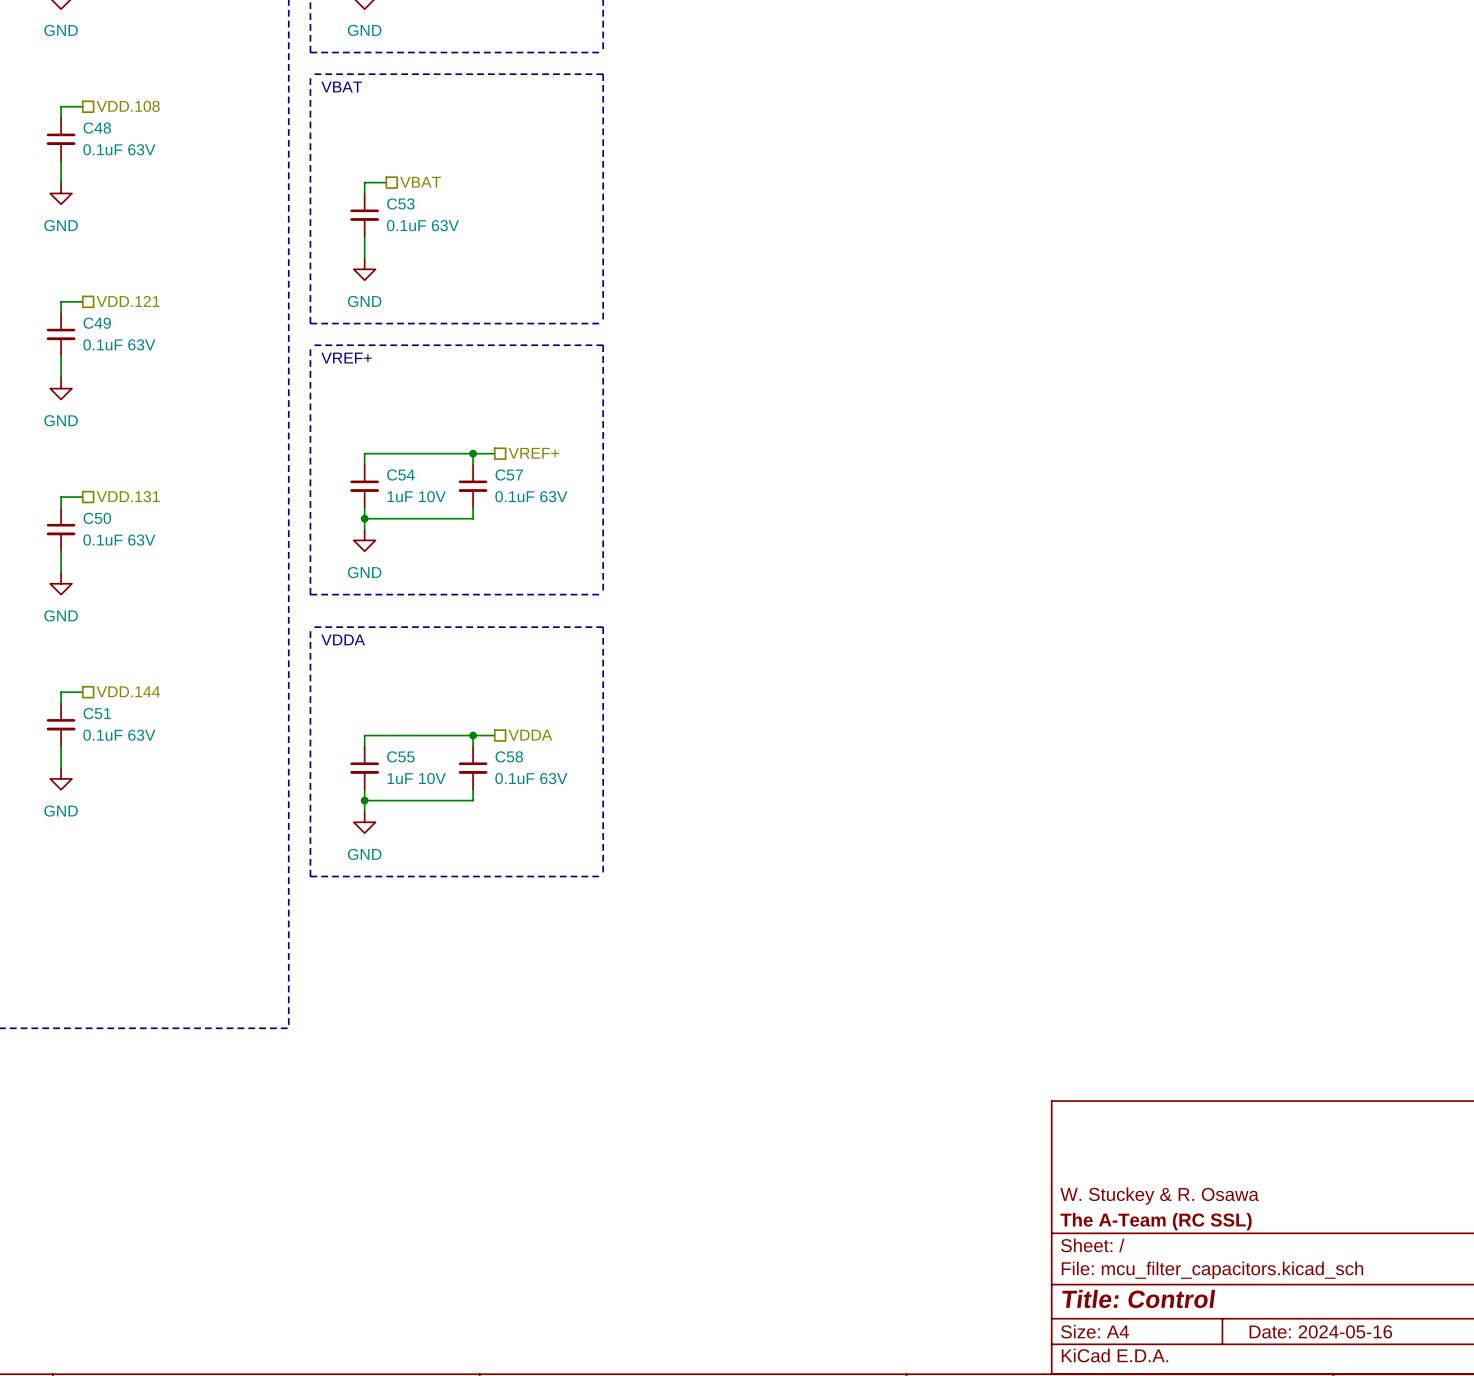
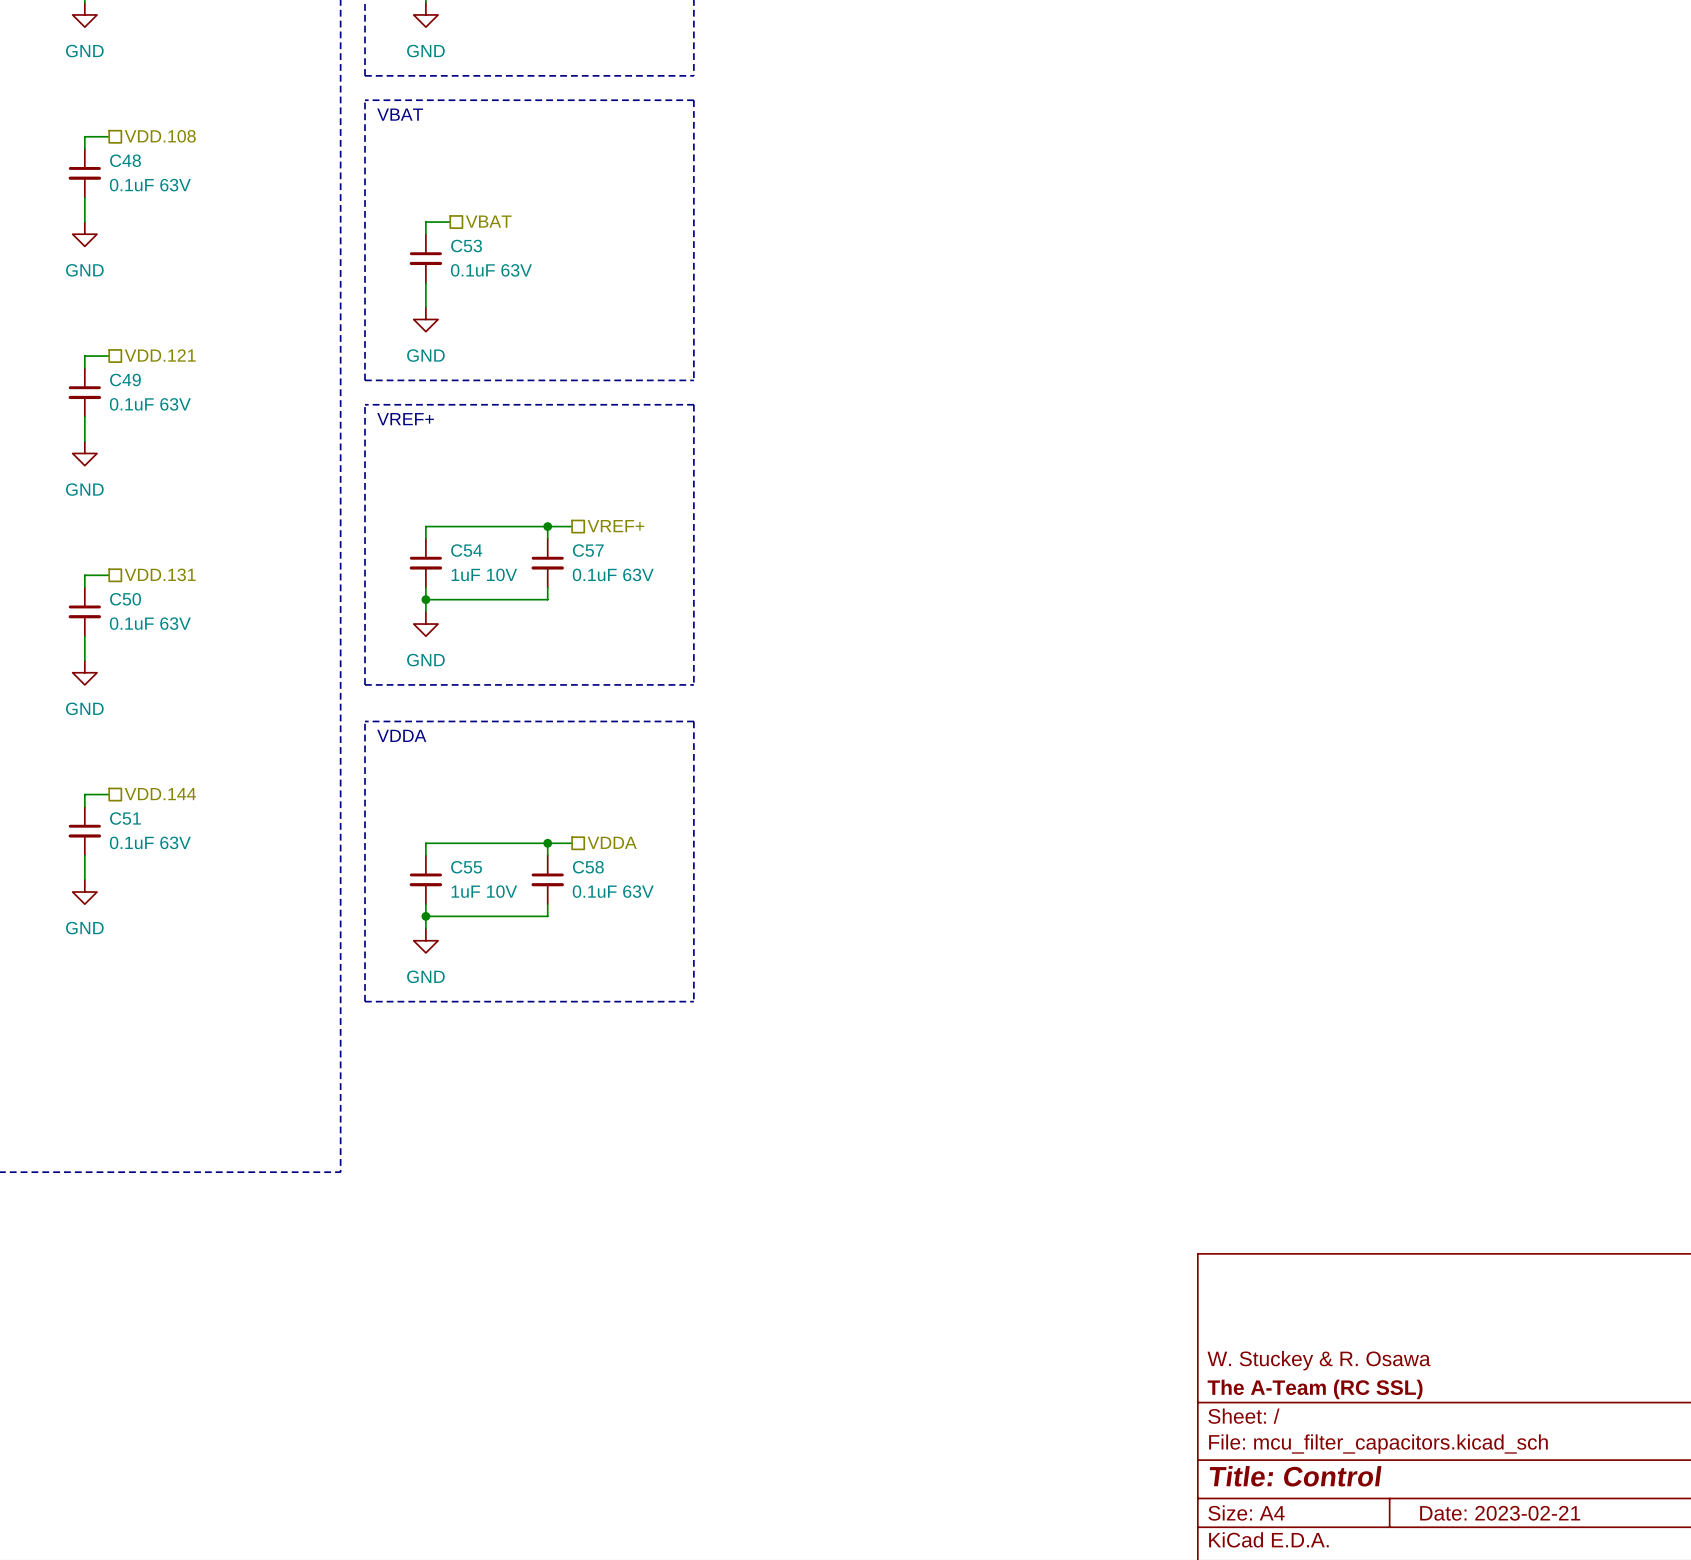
title block: Date: 2024-05-16 (1320, 1331) -> Date: 2023-02-21 (1500, 1513)

